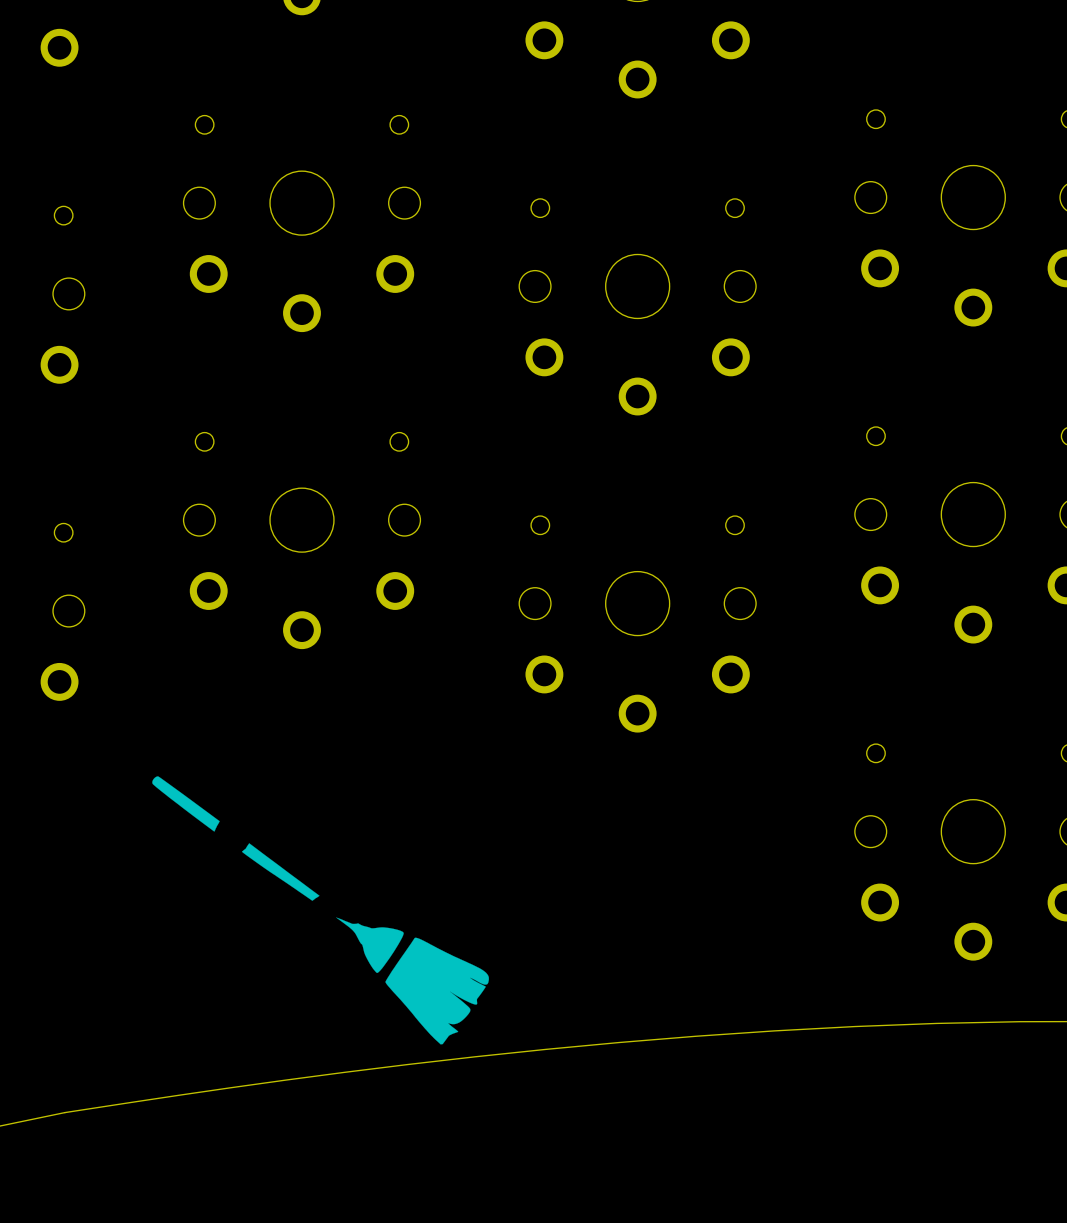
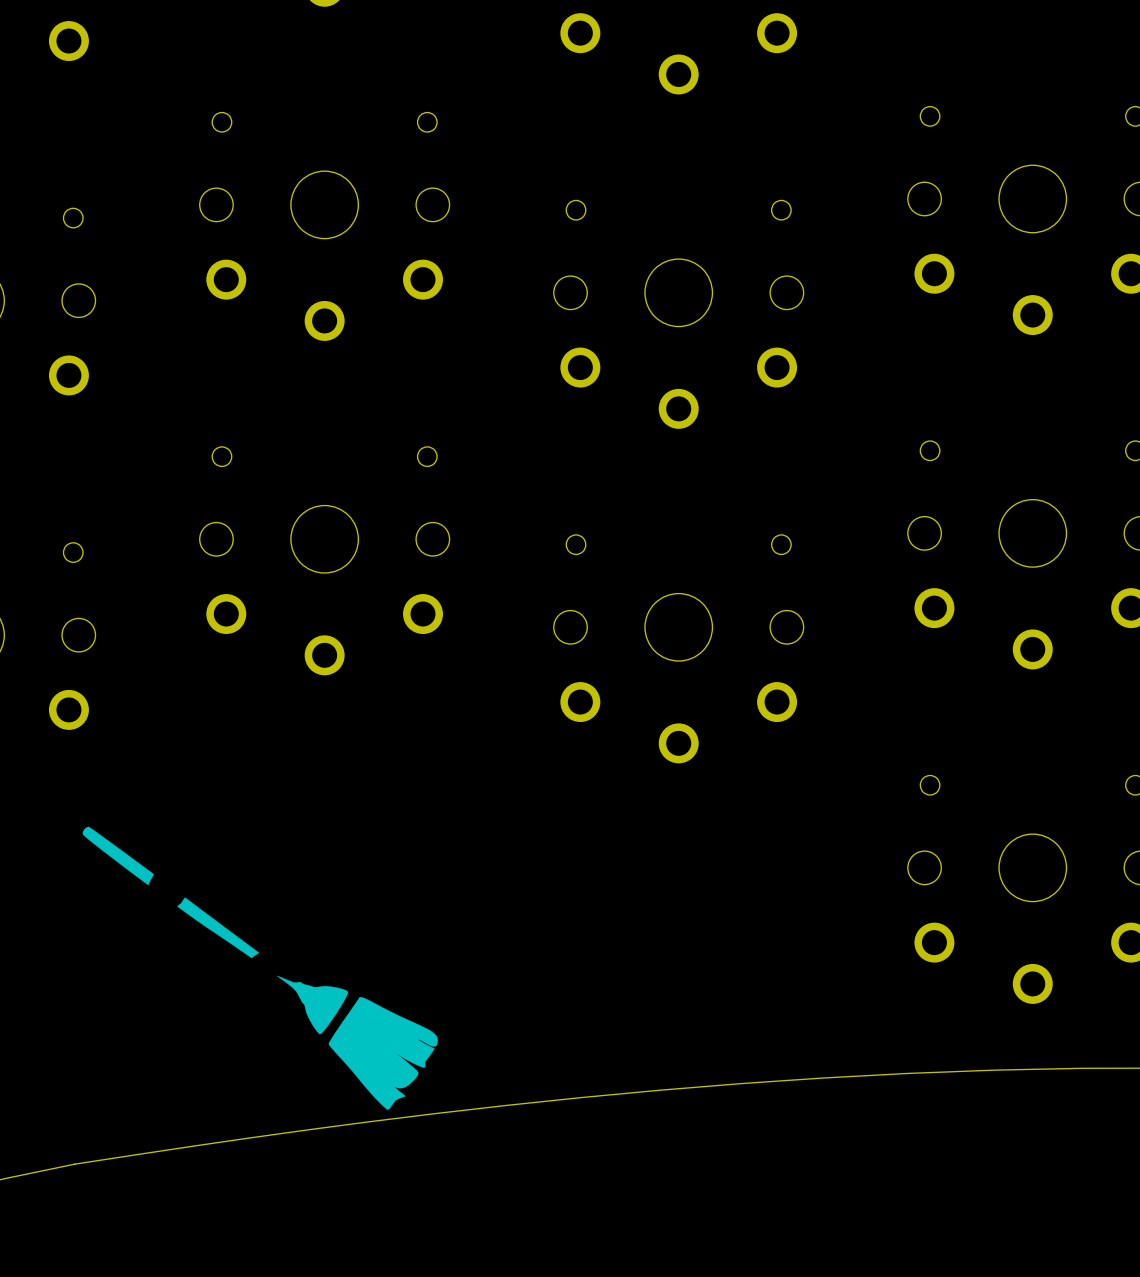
drawing position: (320, 910) -> (260, 968)

